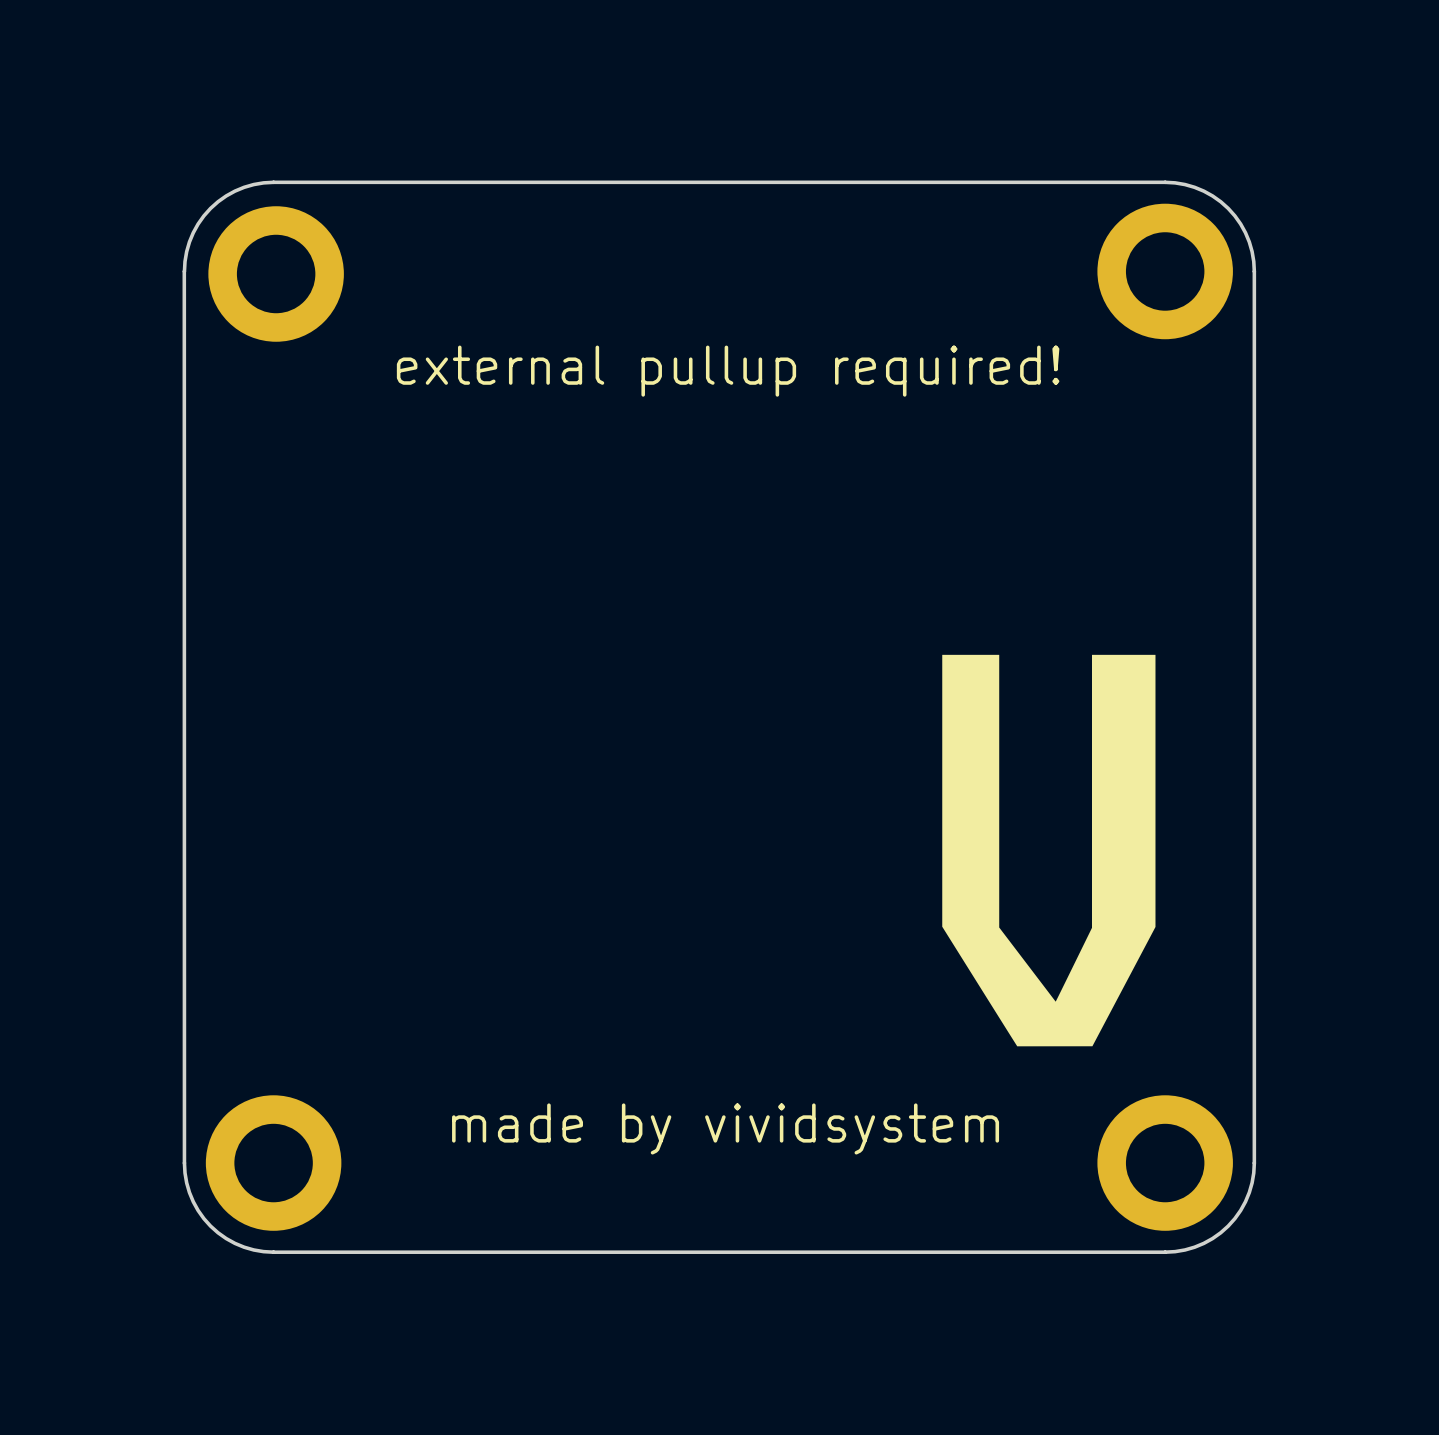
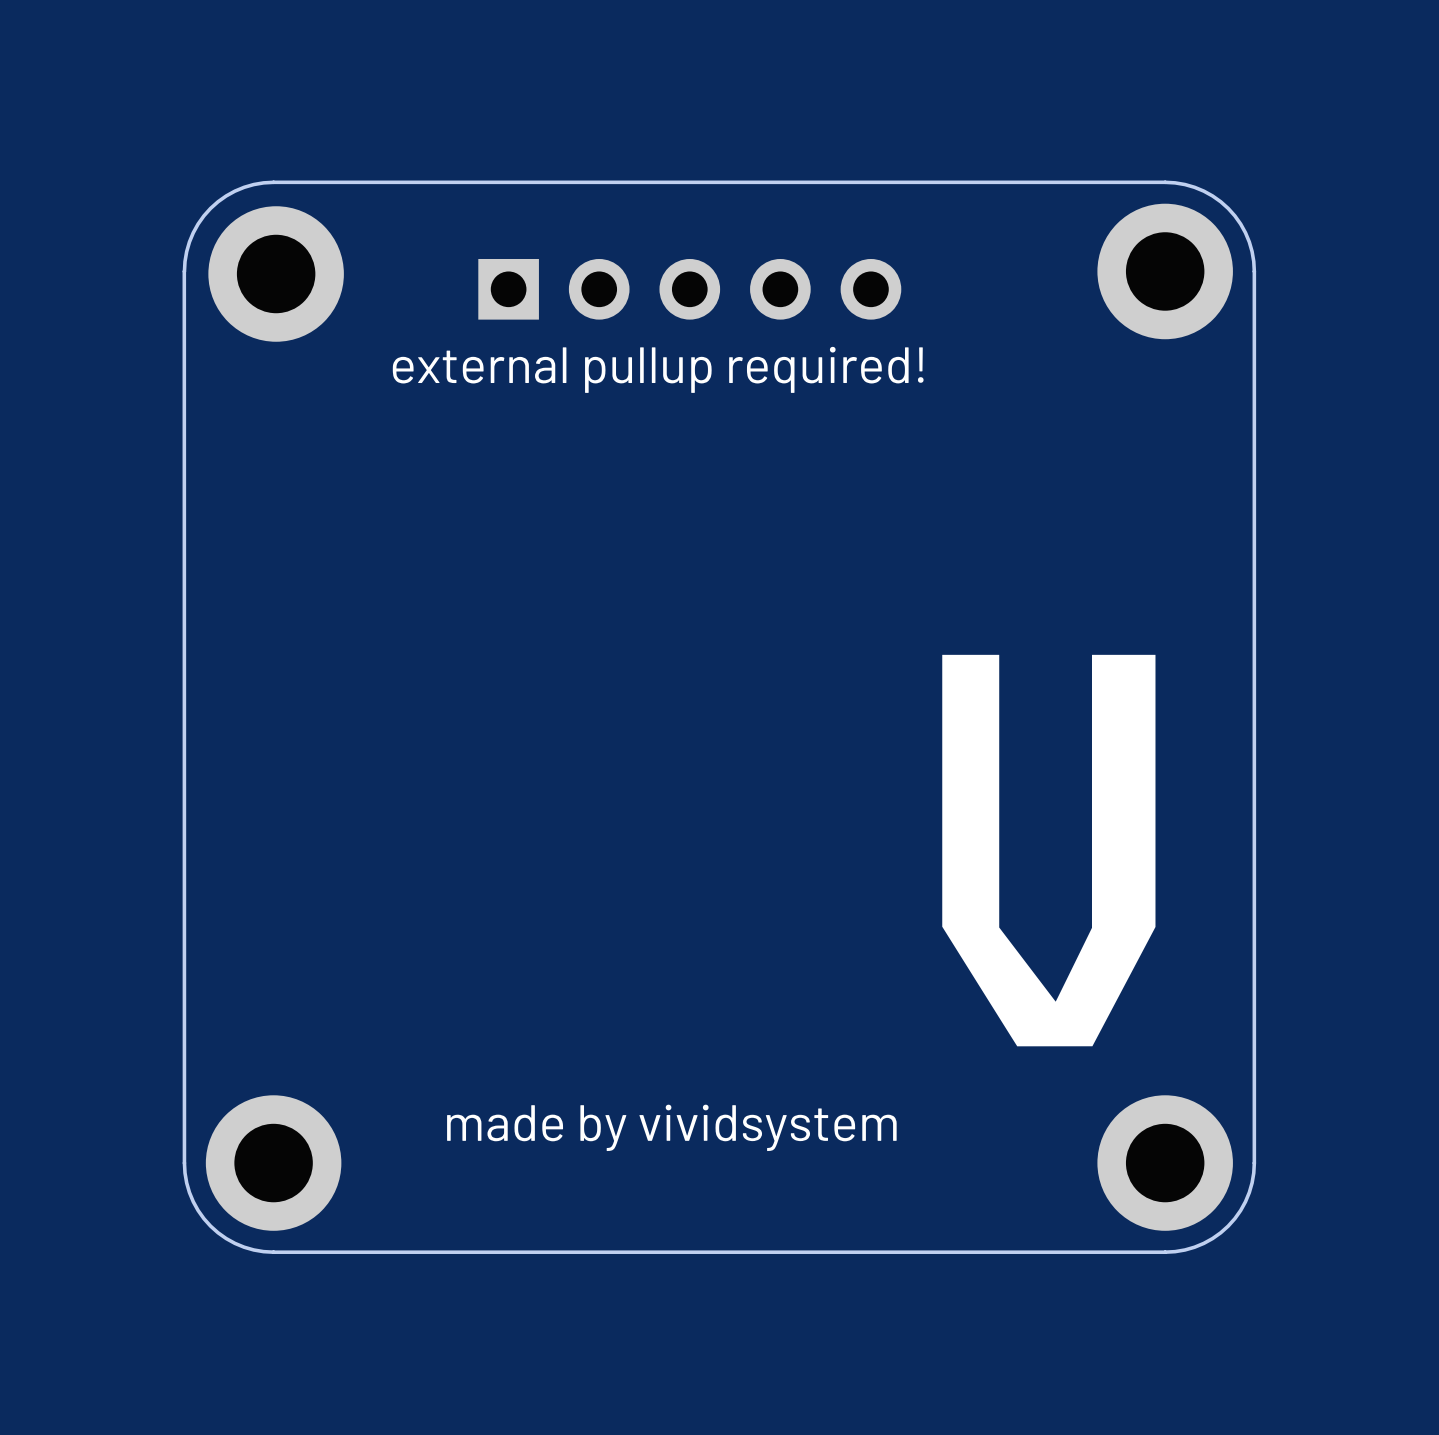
part: none -> (689, 289)

